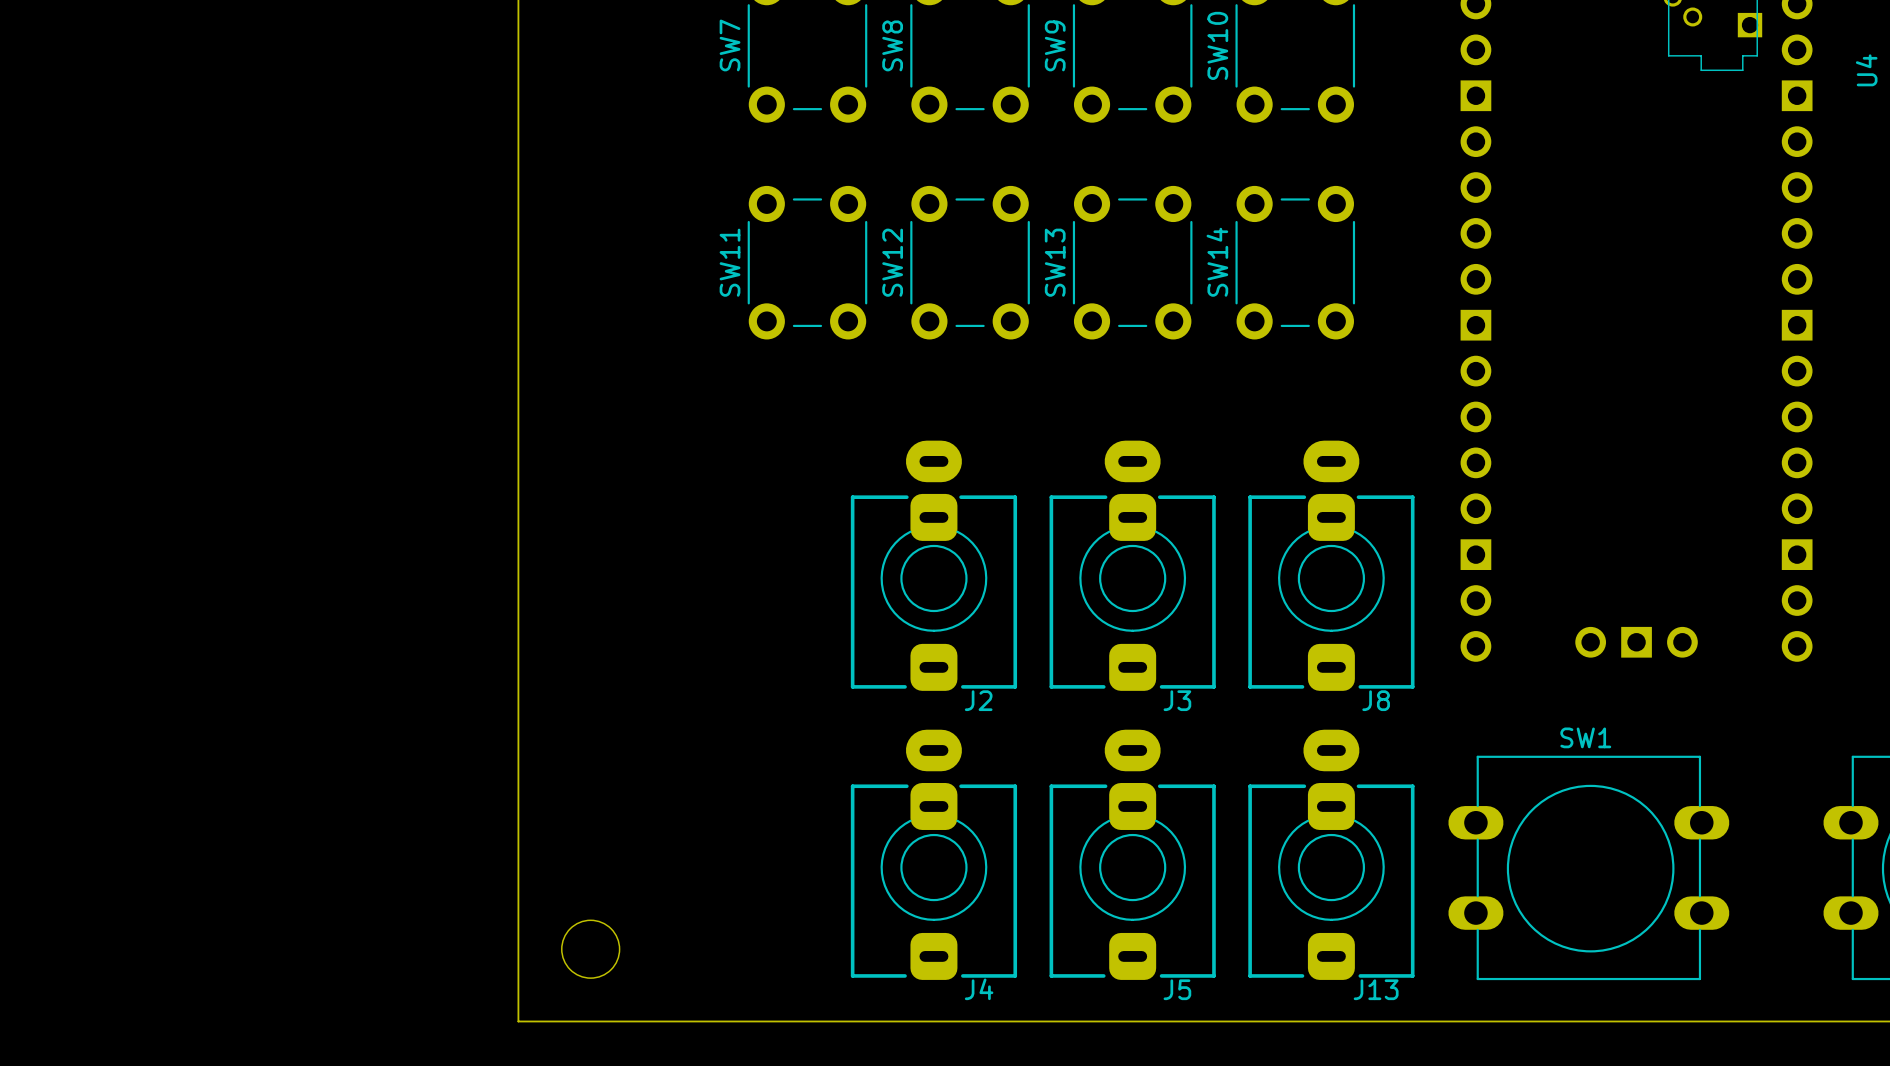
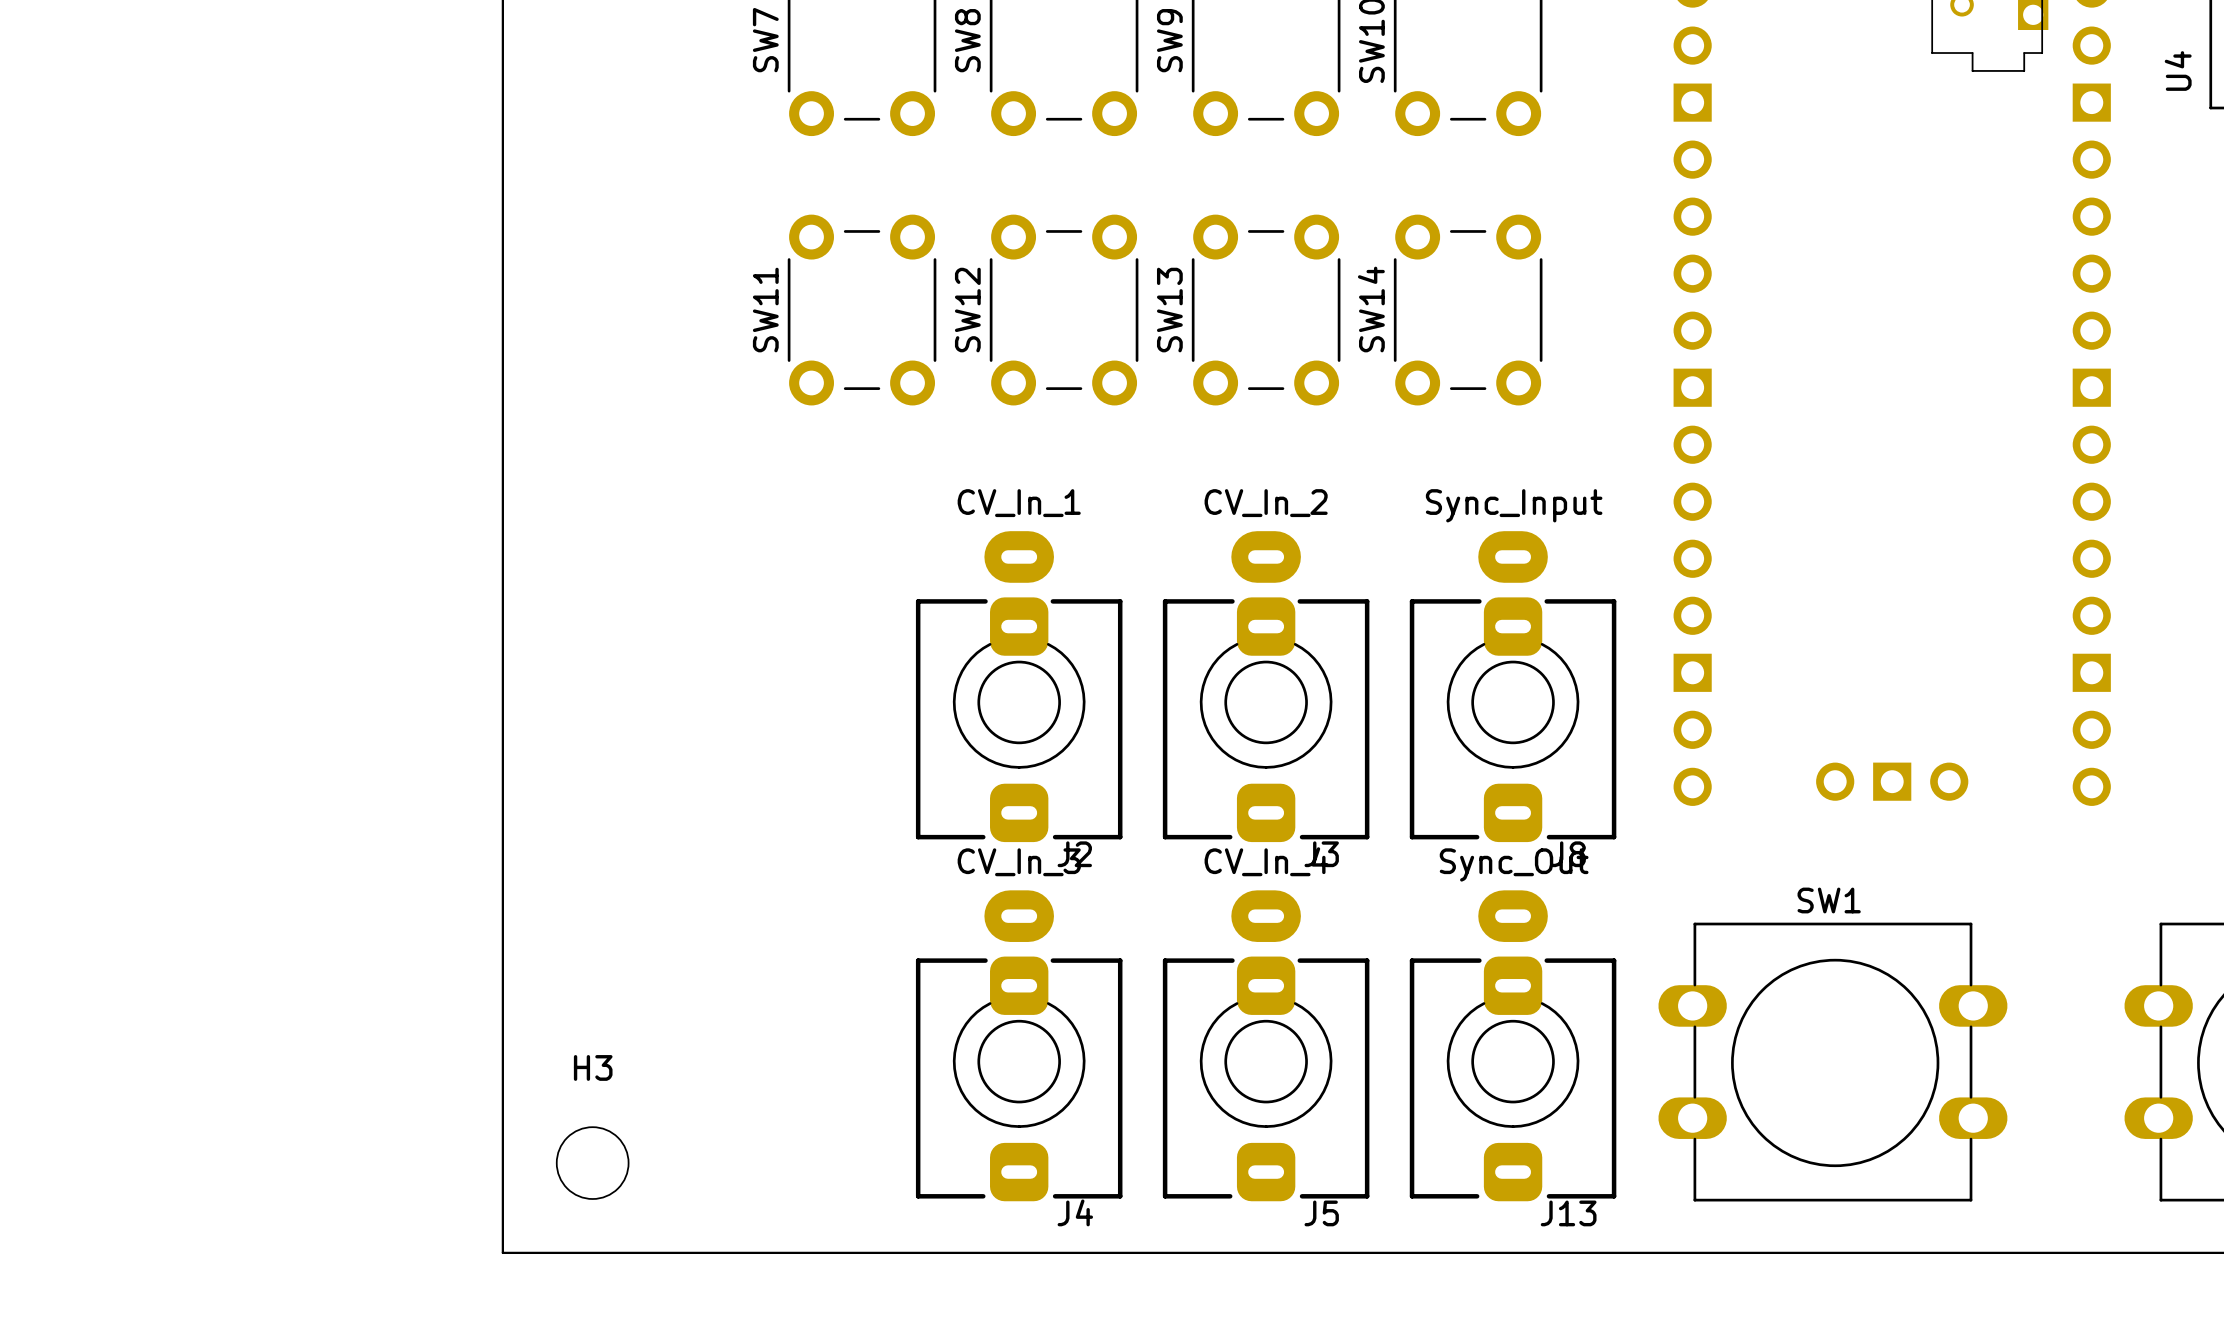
J2 value: none -> CV_In_1 (1019, 503)
J3 value: none -> CV_In_2 (1266, 503)
J8 value: none -> Sync_Input (1514, 505)
J5 value: none -> CV_In_4 (1266, 861)
J4 value: none -> CV_In_3 (1019, 862)
J13 value: none -> Sync_Out (1514, 864)
H3 name: none -> H3 (593, 1067)

